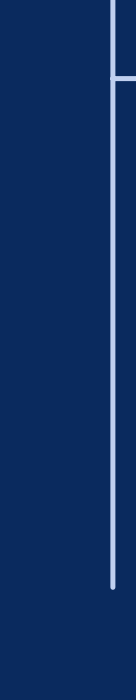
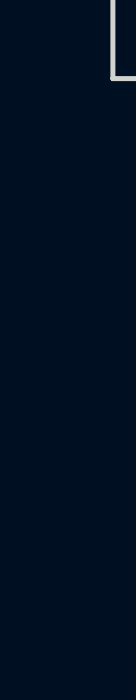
board edge: (112, 78) (112, 587) -> none

